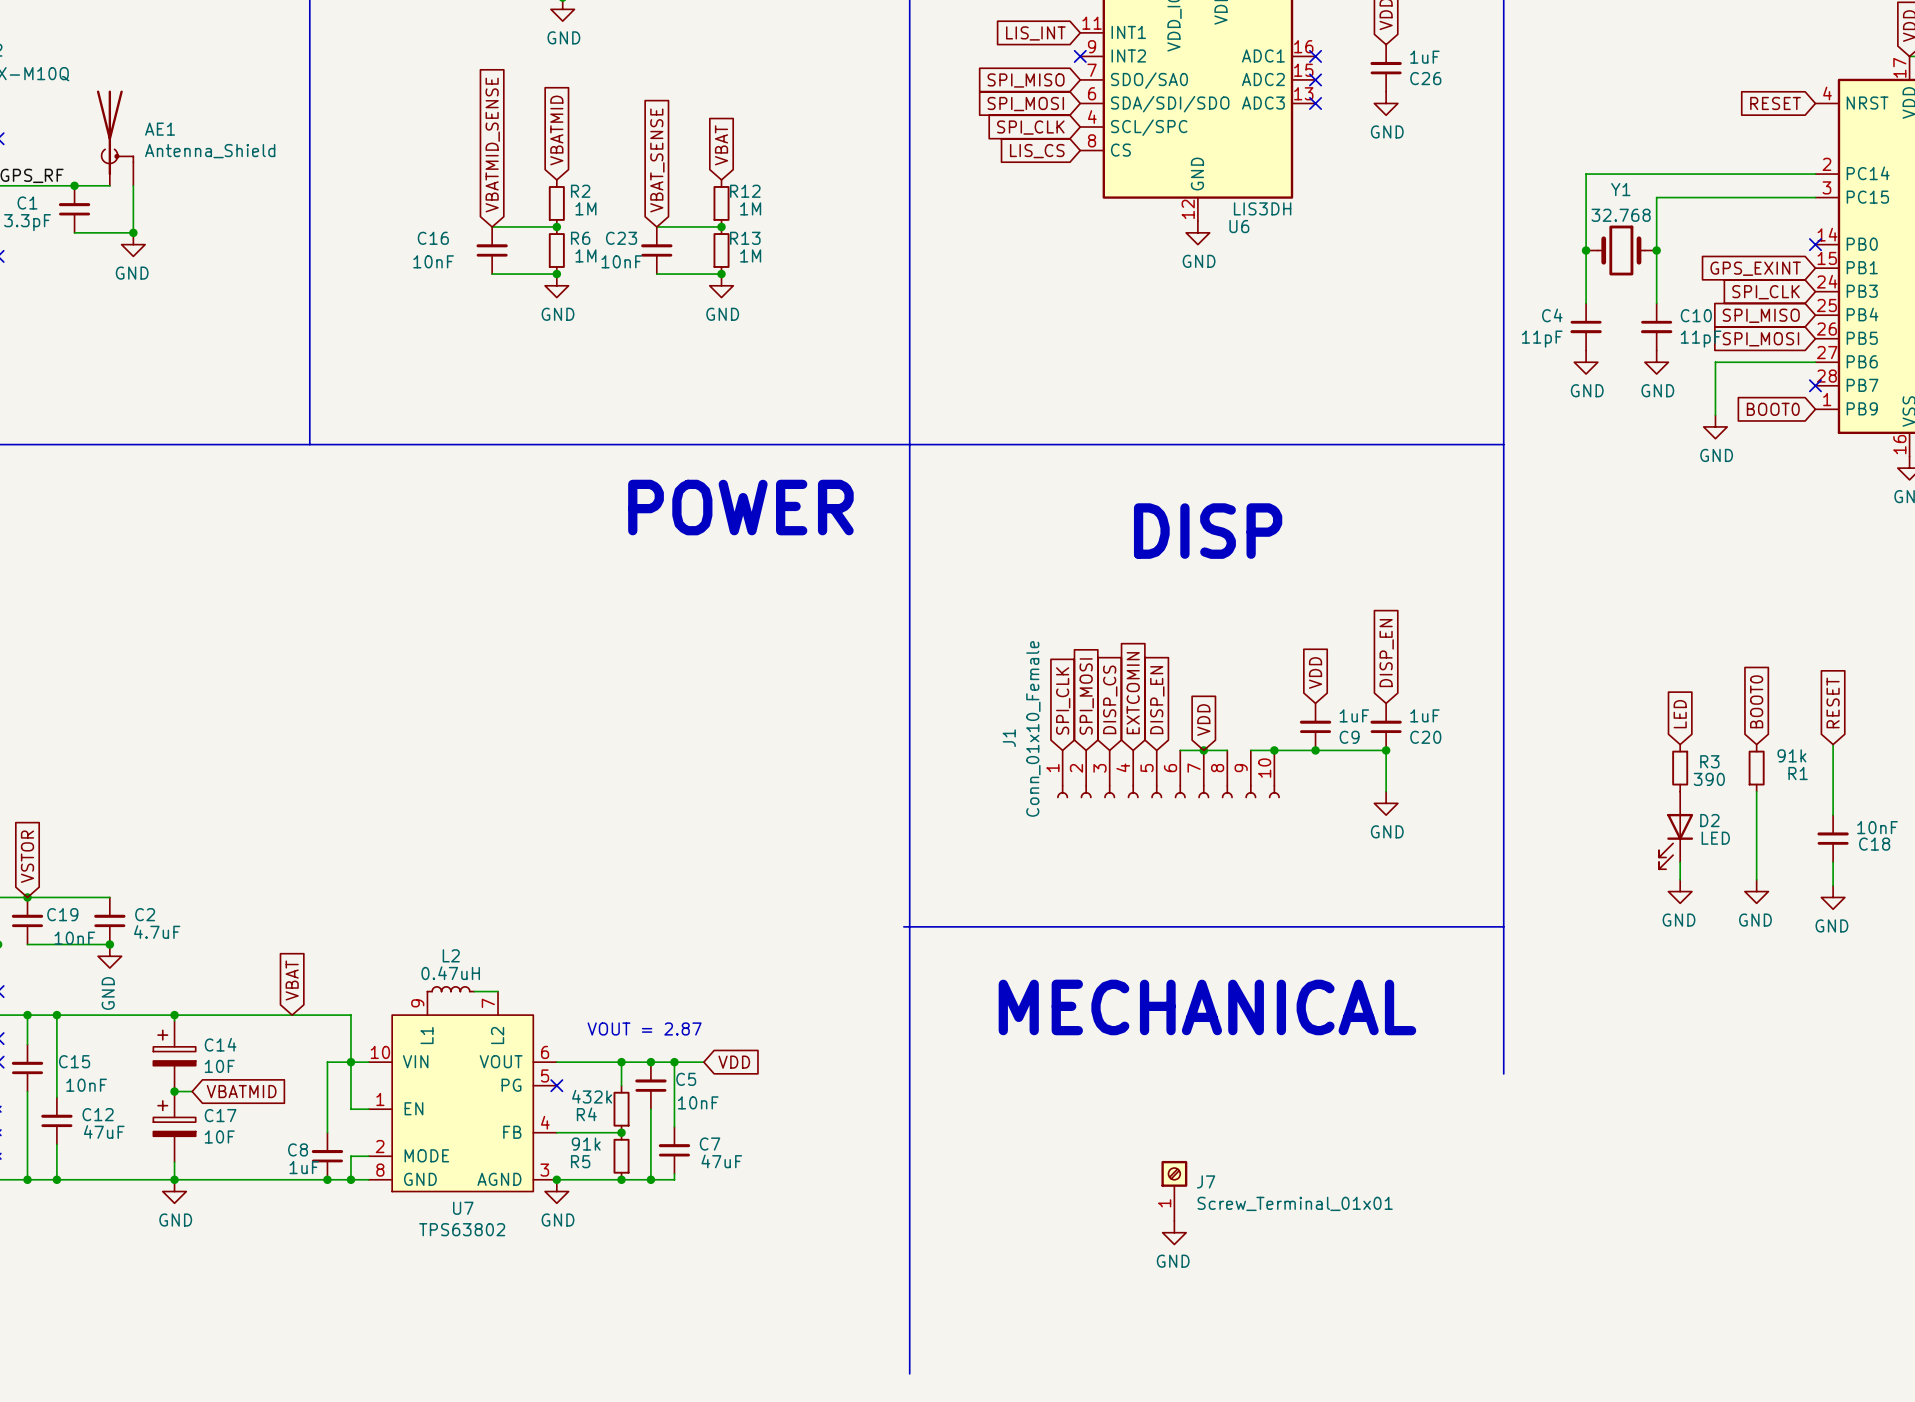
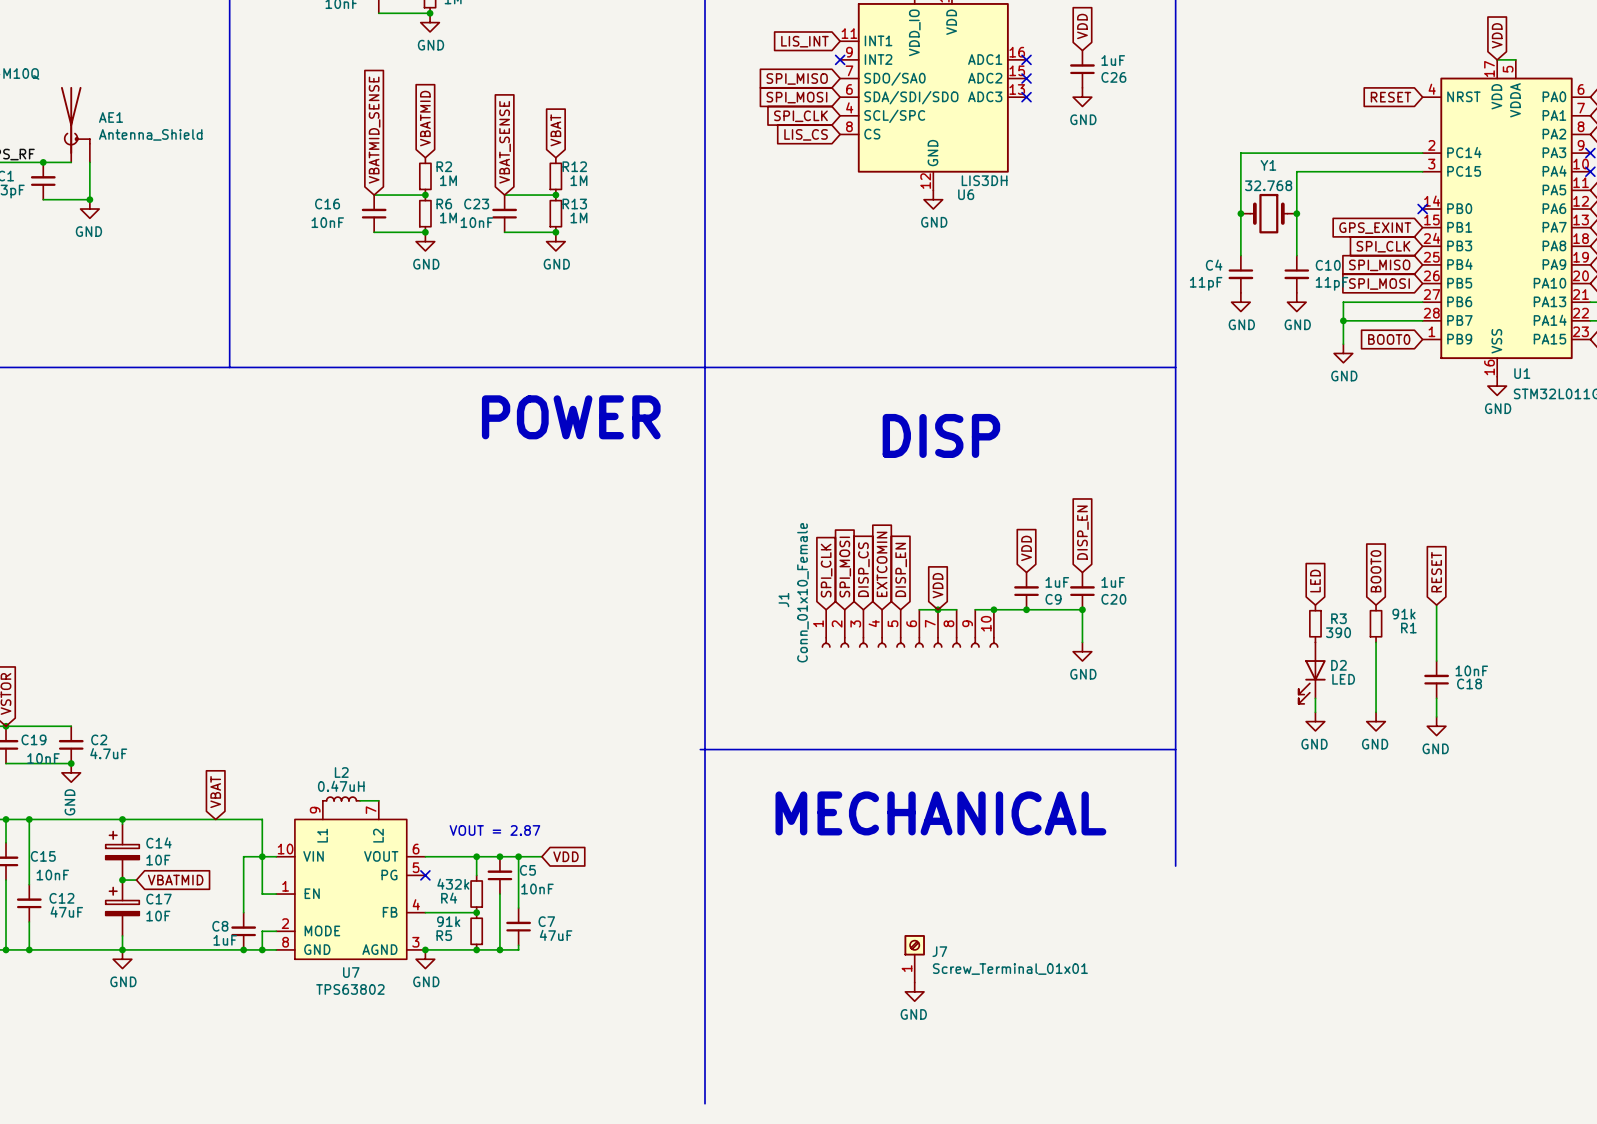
wire: none -> (1343, 320) (1422, 320)
junction: none -> (1343, 320)
no-connect mark: (1815, 385) -> none

